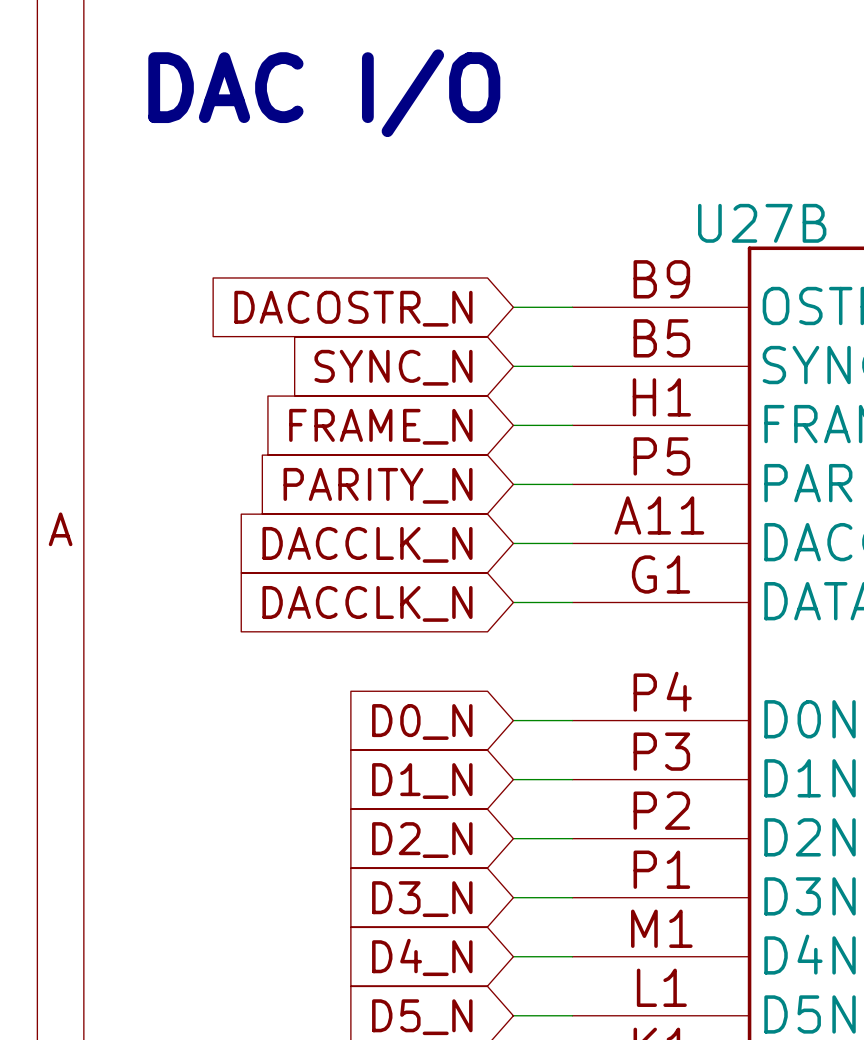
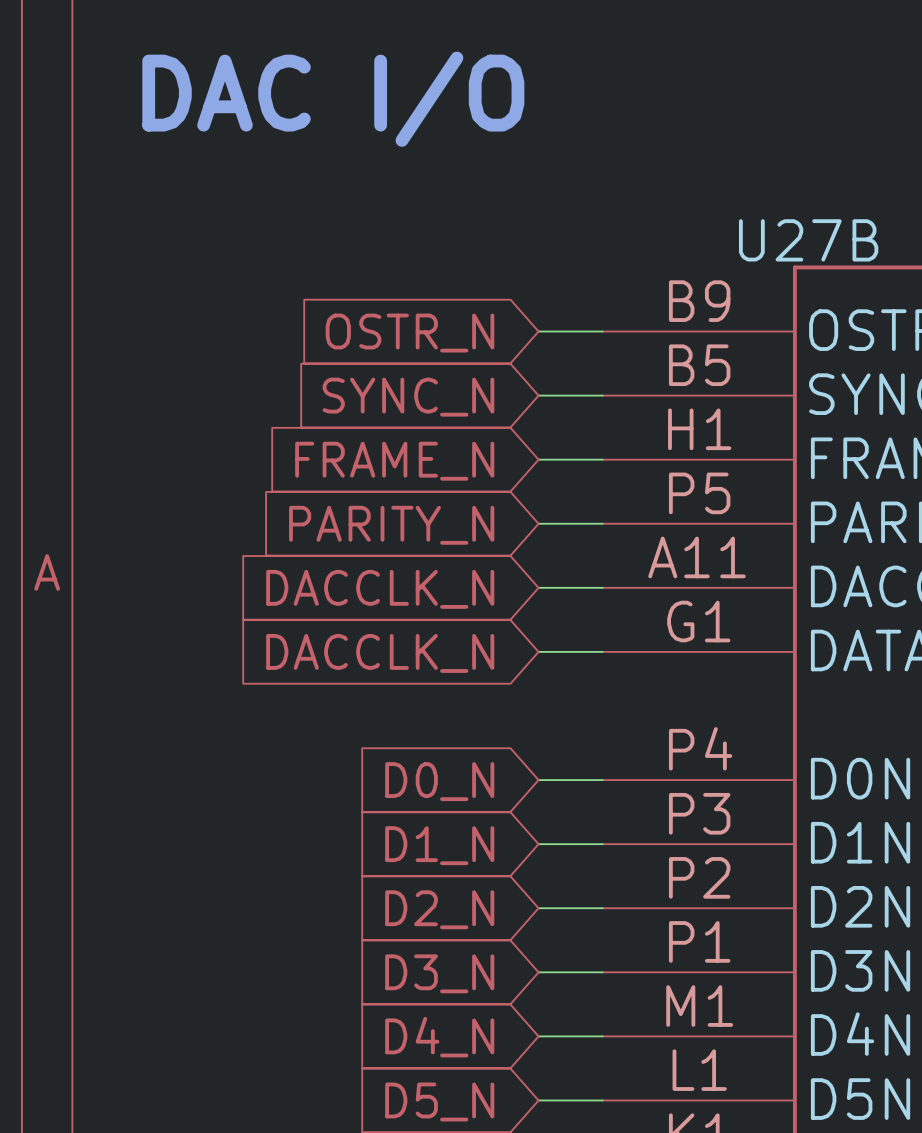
global label: DACOSTR_N (353, 308) -> OSTR_N (409, 333)

